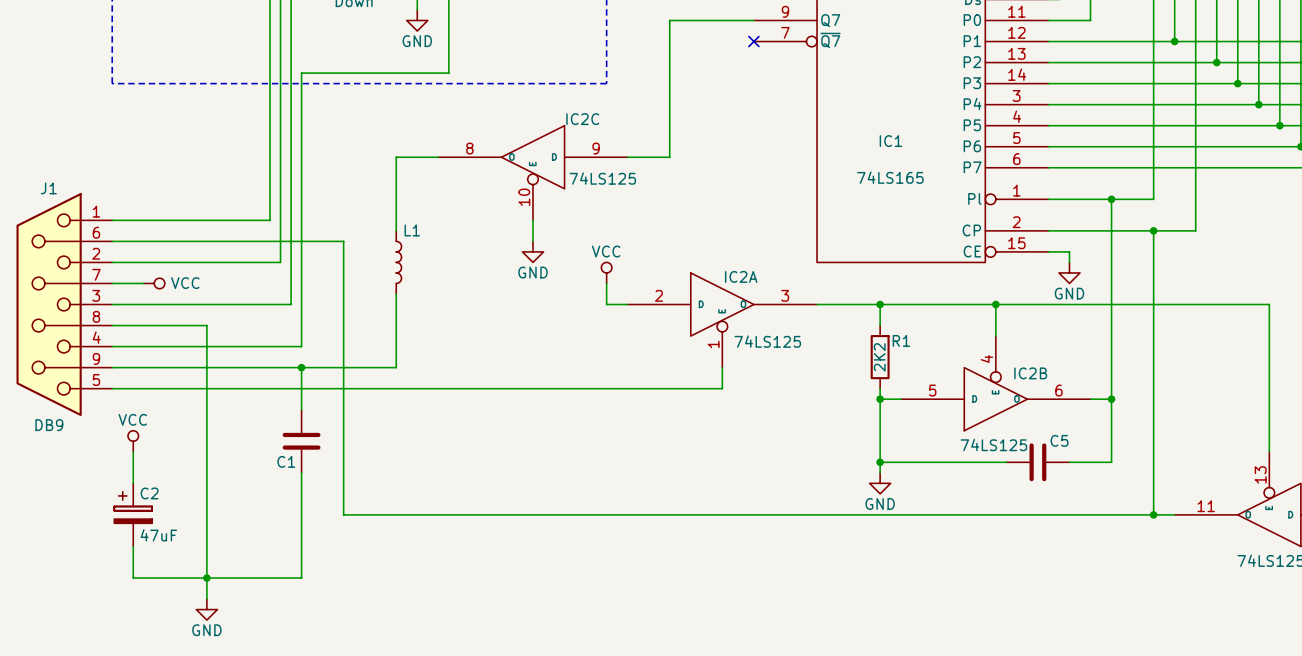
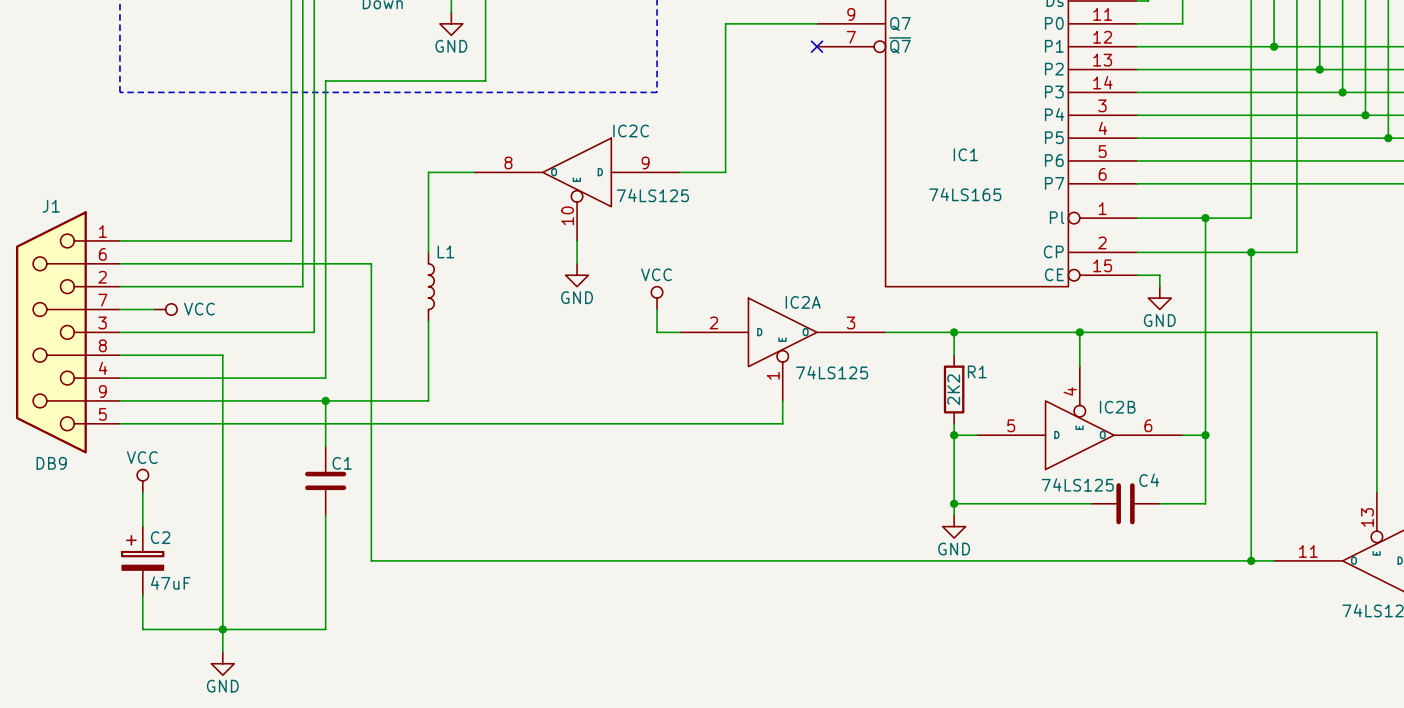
C5 name: C5 (1059, 440) -> C4 (1149, 480)
C1 name position: C1 (286, 461) -> C1 (342, 463)

